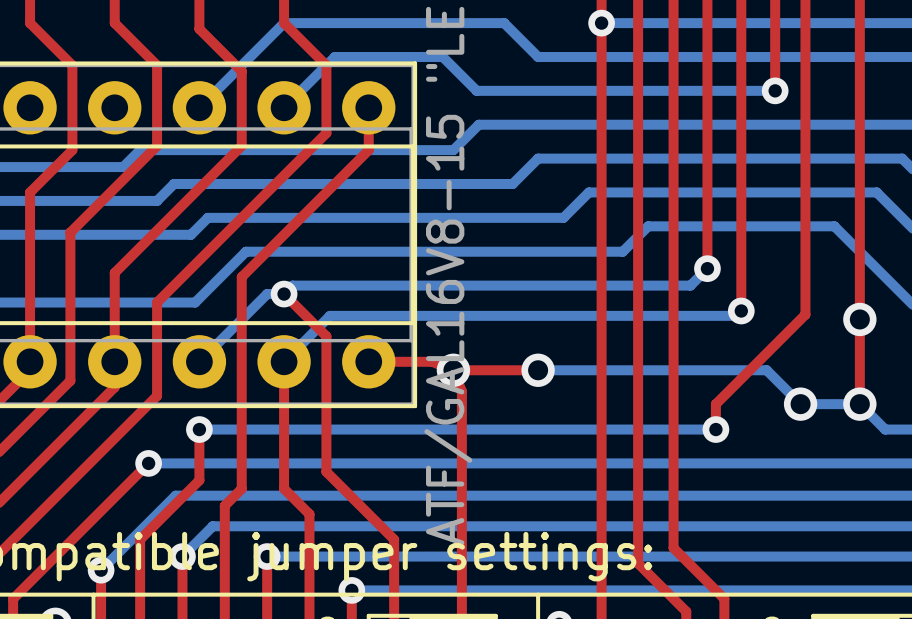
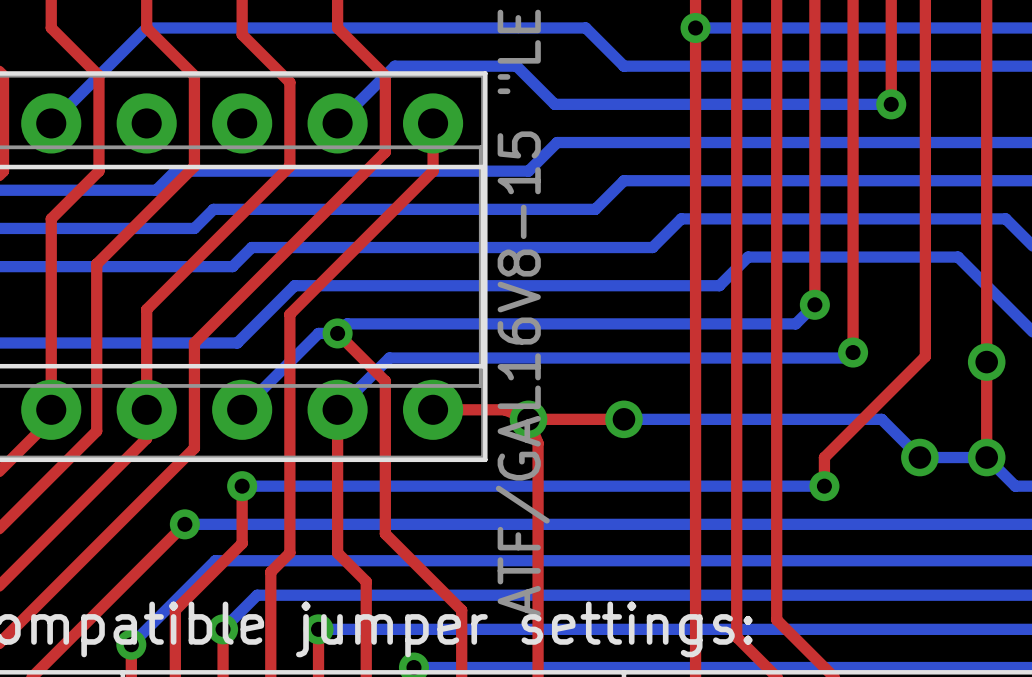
bottom track: (284, 23) (199, 107) -> (337, 27) (146, 27) (51, 123)

